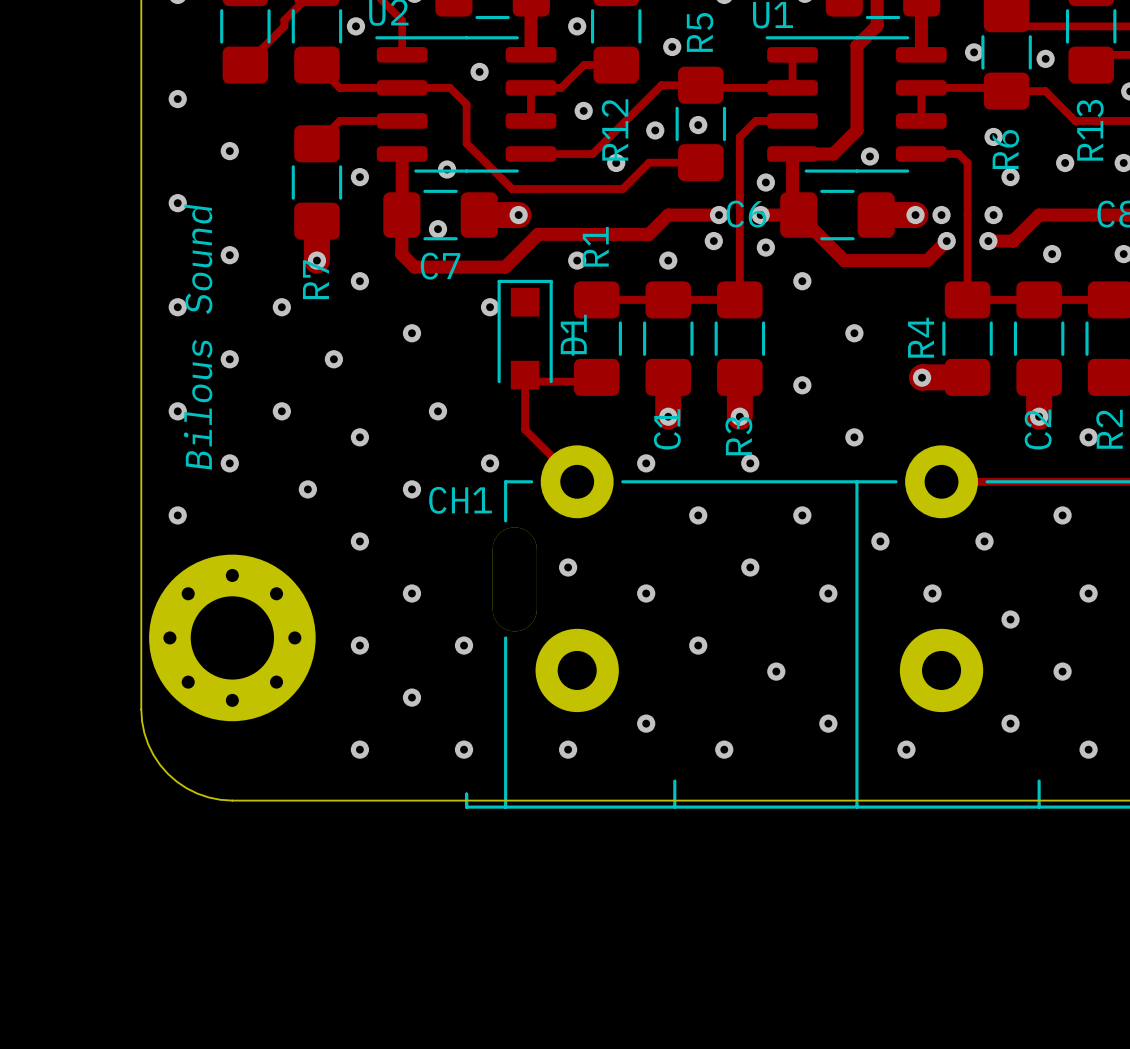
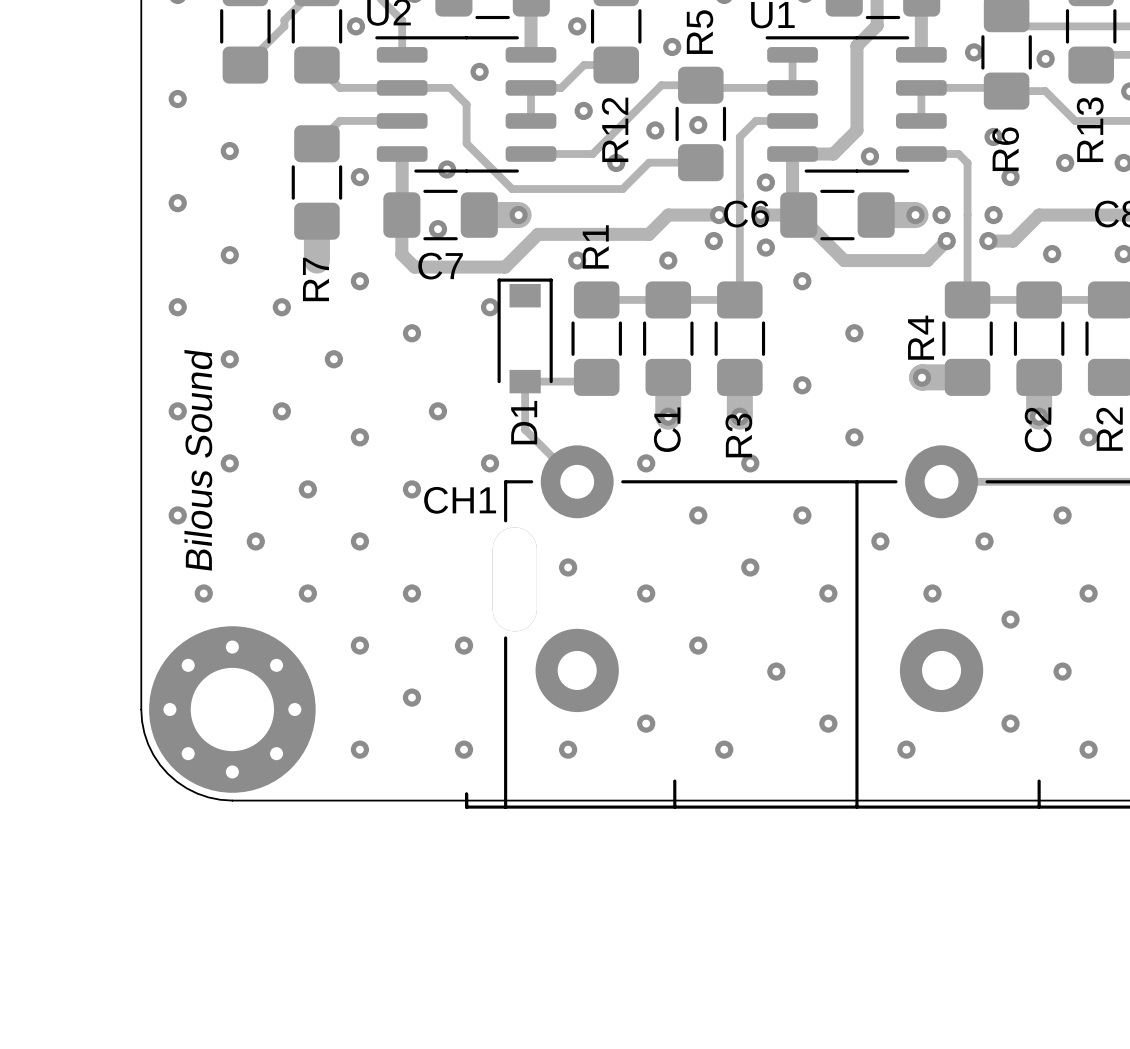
via: (316, 260) -> none
D1 footprint: [497, 279, 553, 390] -> [497, 278, 553, 394]
D1 name position: D1 (573, 334) -> D1 (524, 422)
text position: Bilous Sound (198, 337) -> Bilous Sound (198, 460)
via: none -> (255, 541)
via: none -> (203, 593)
via: none -> (307, 593)
part position: (232, 637) -> (232, 709)

